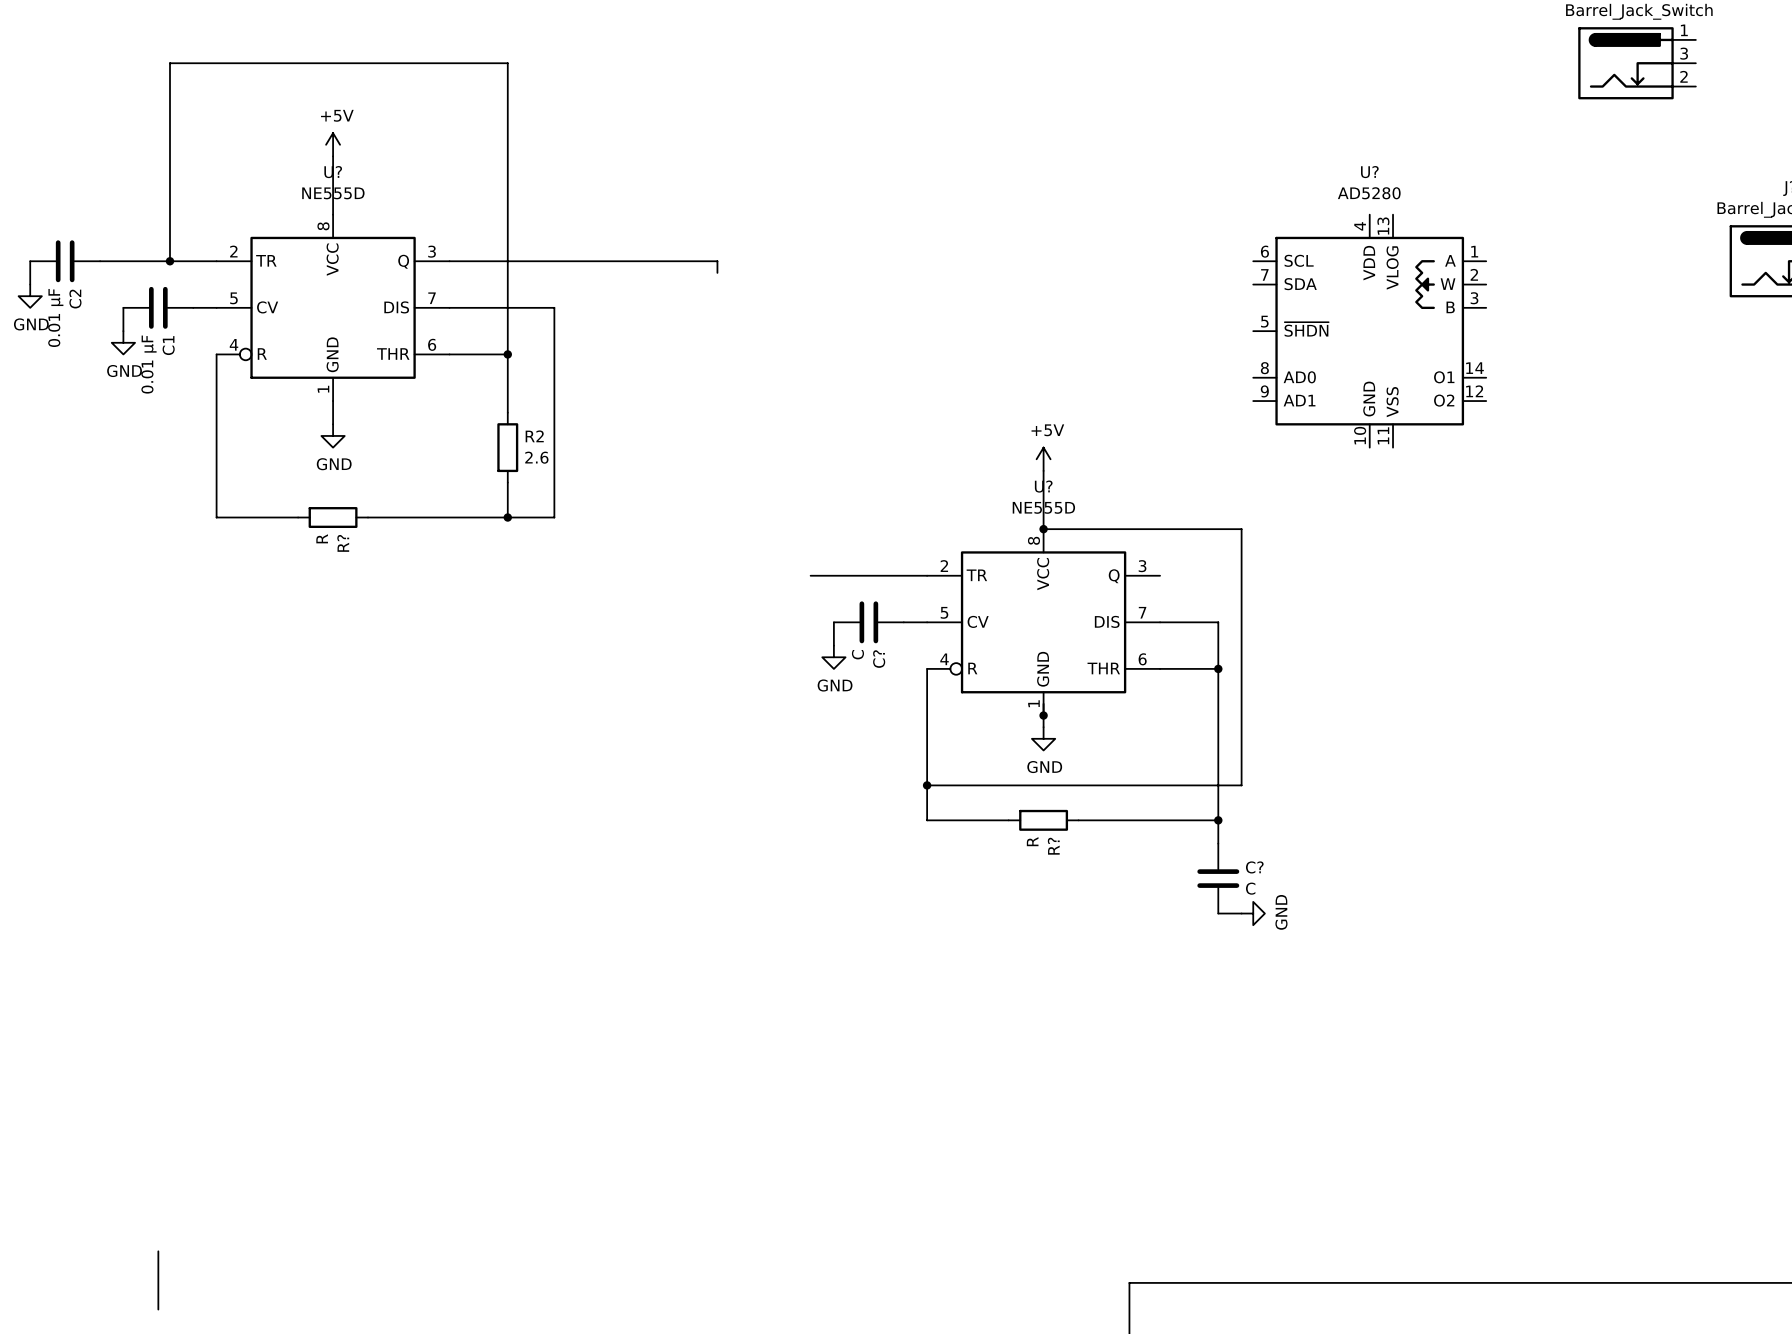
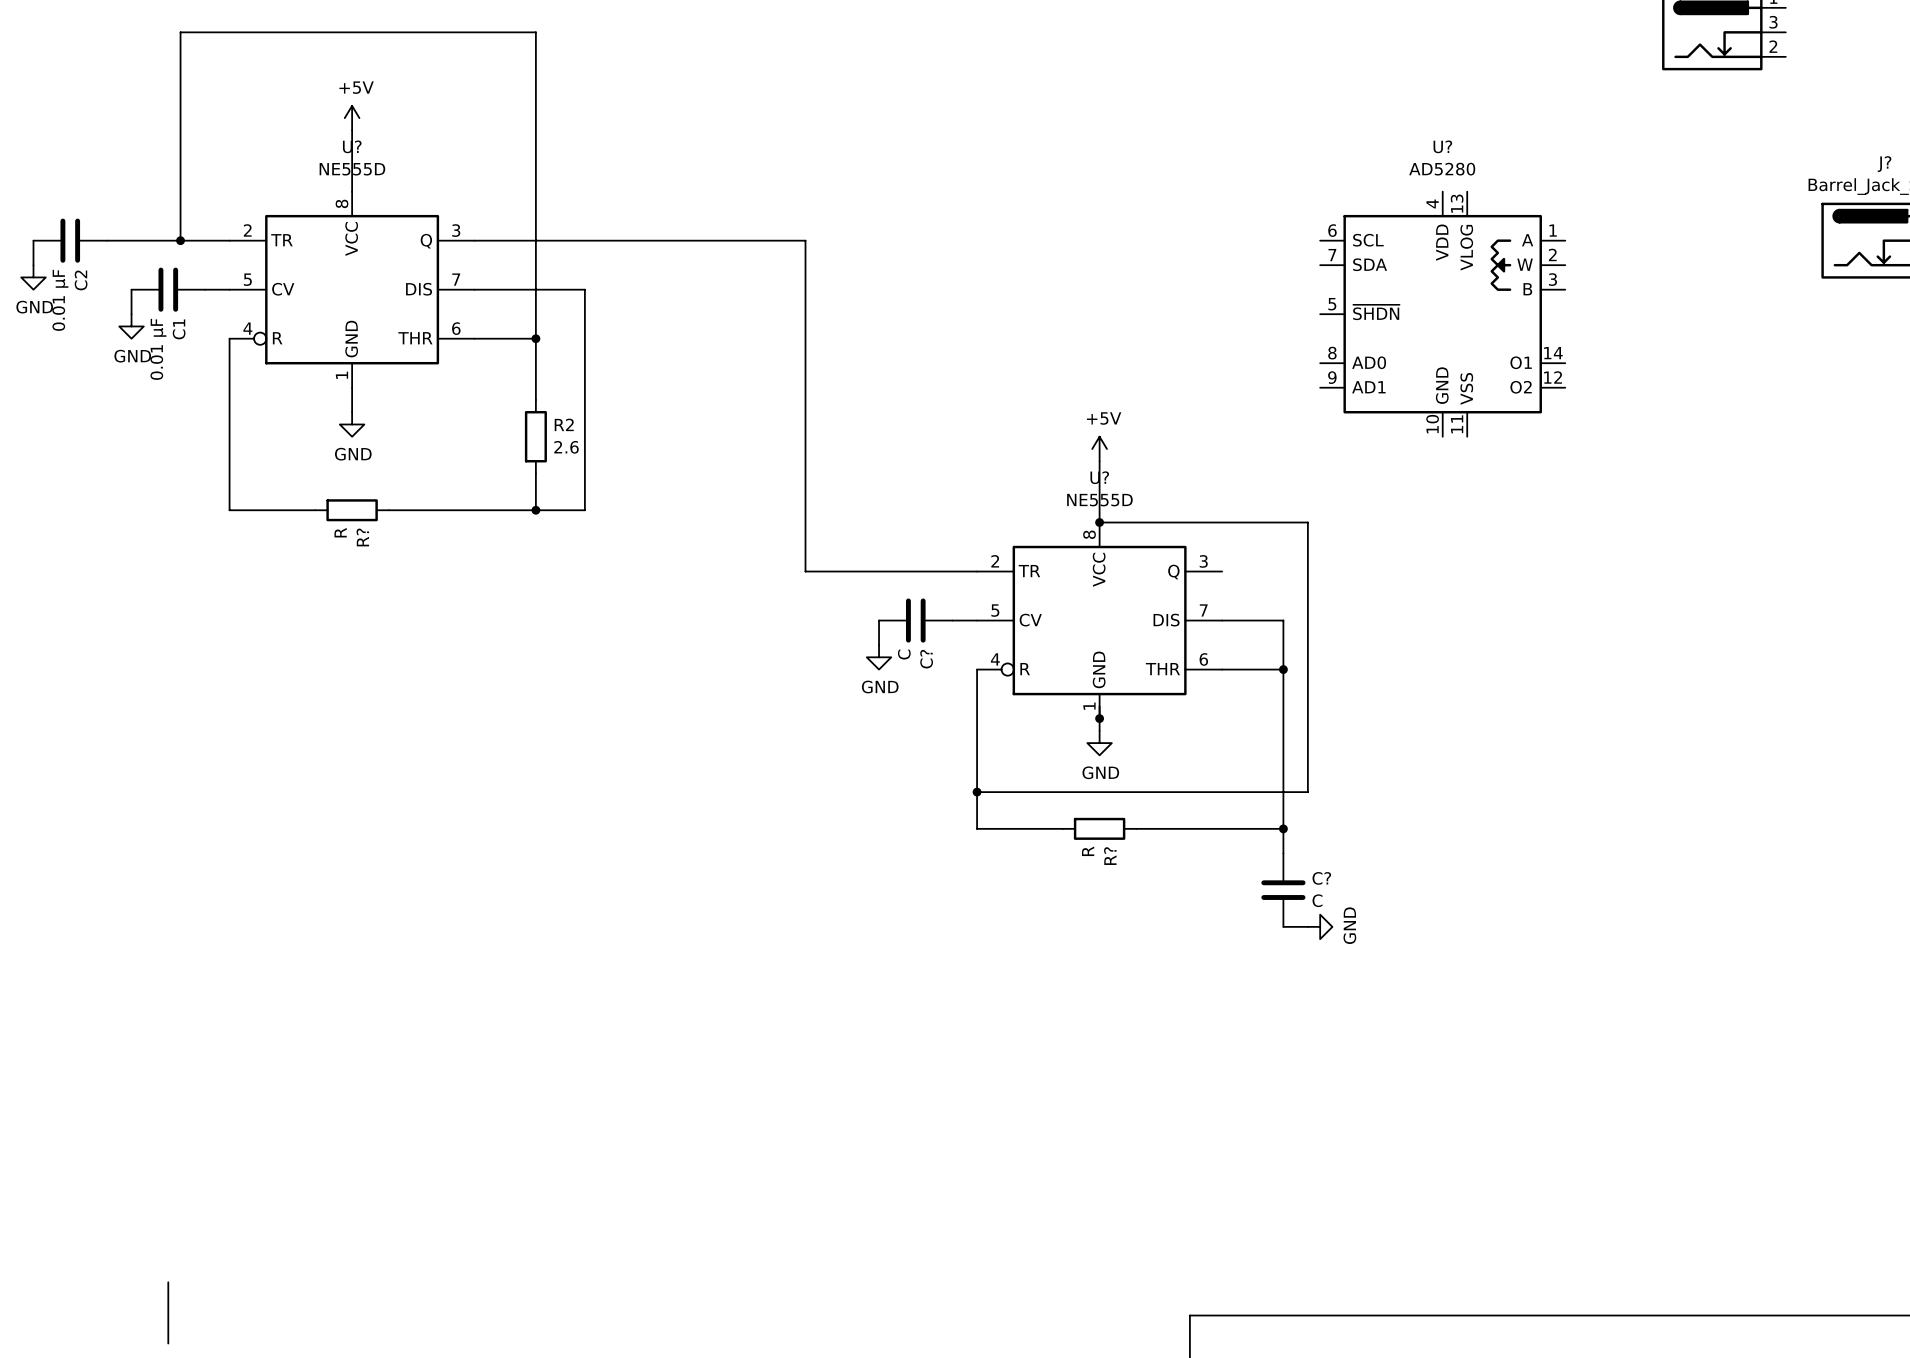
wire: (717, 261) (717, 272) -> (756, 240) (805, 240) (805, 571) (854, 571)

